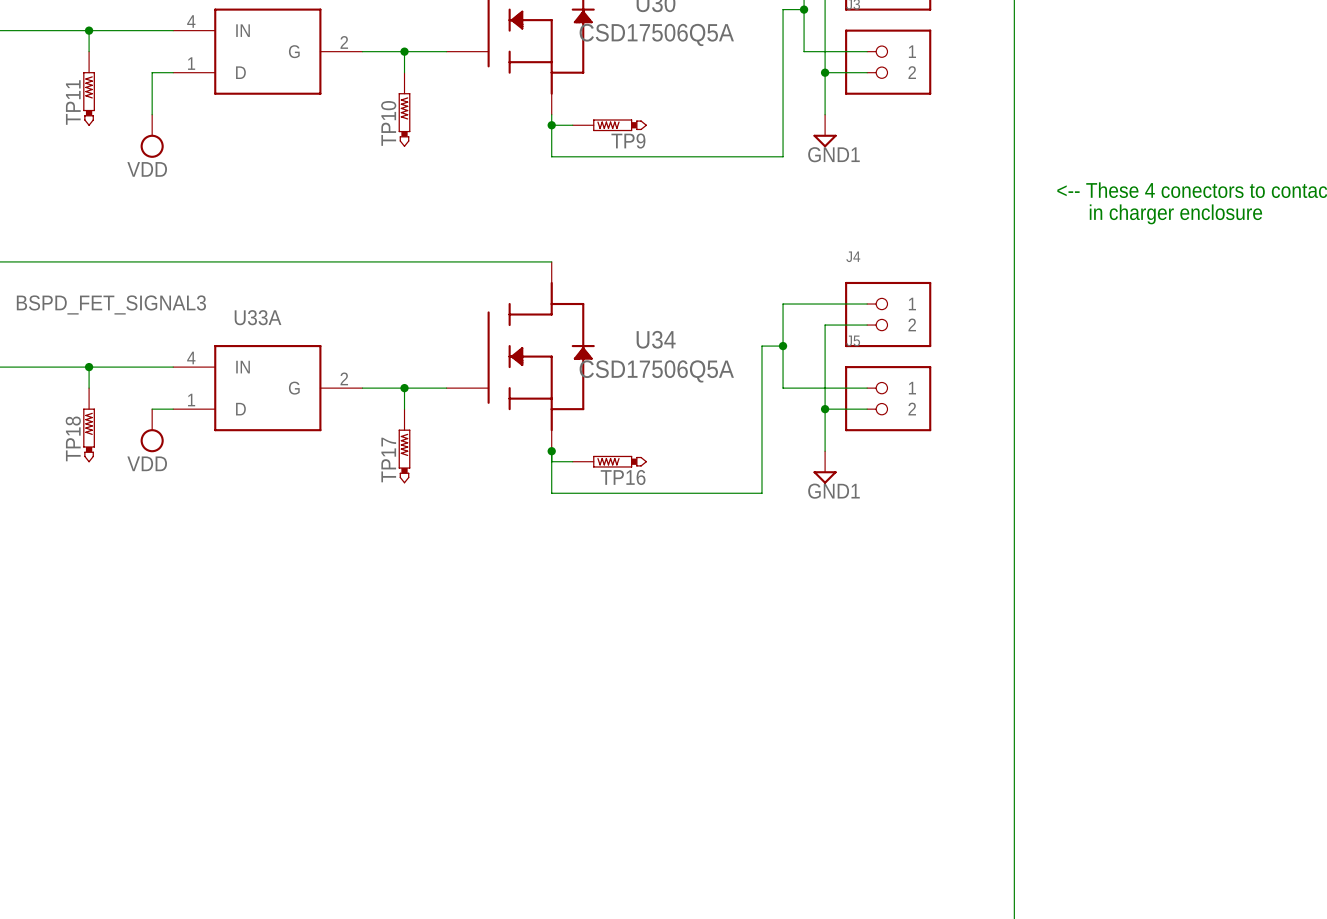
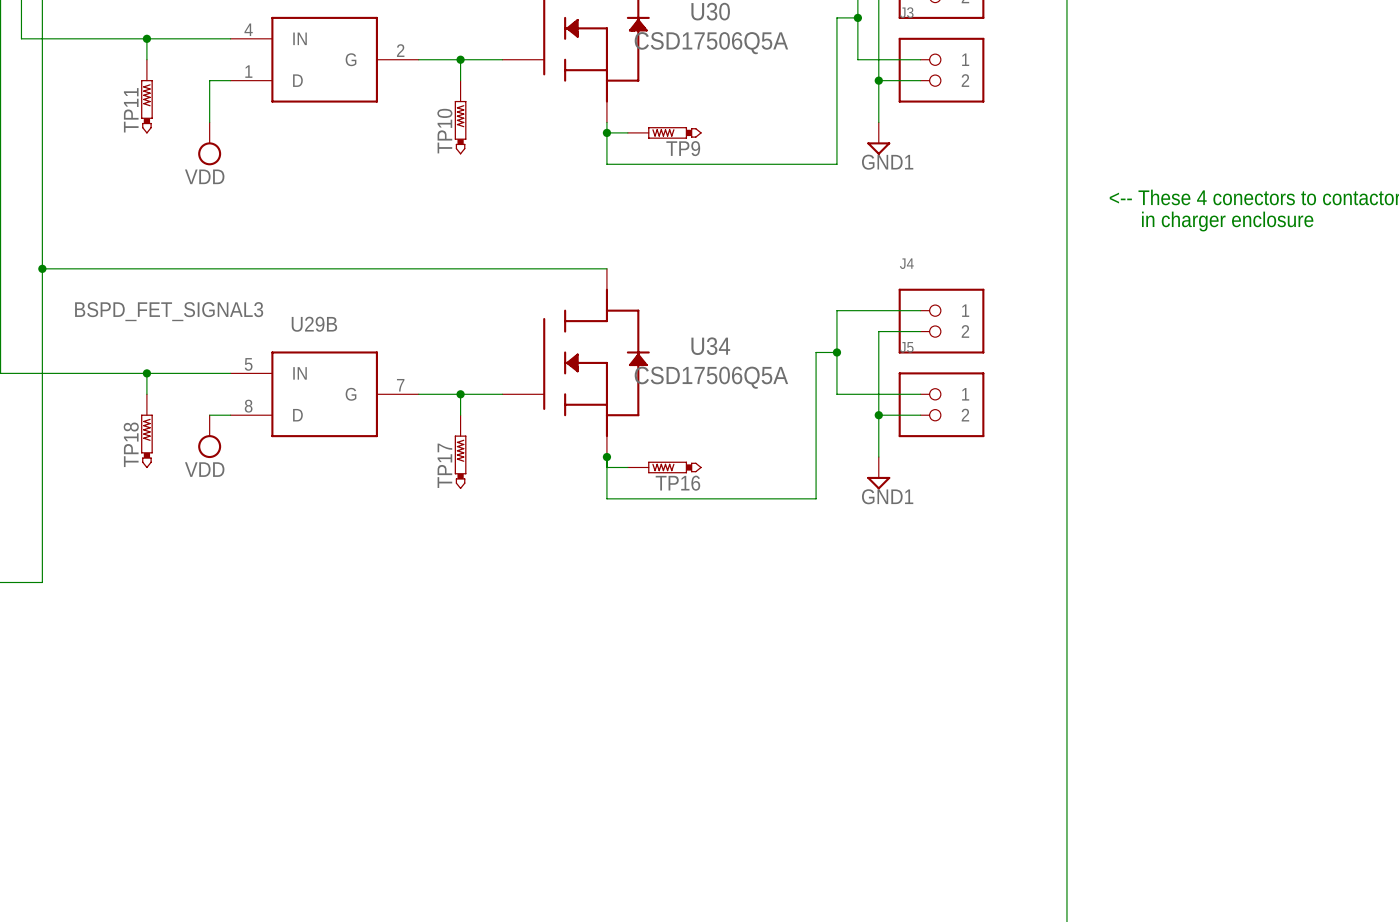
U33A name: U33A (258, 317) -> U29B (314, 324)
U33A pin number: 4 (191, 357) -> 5 (248, 364)
U33A pin number: 2 (344, 378) -> 7 (400, 385)
U33A pin number: 1 (191, 400) -> 8 (248, 406)

